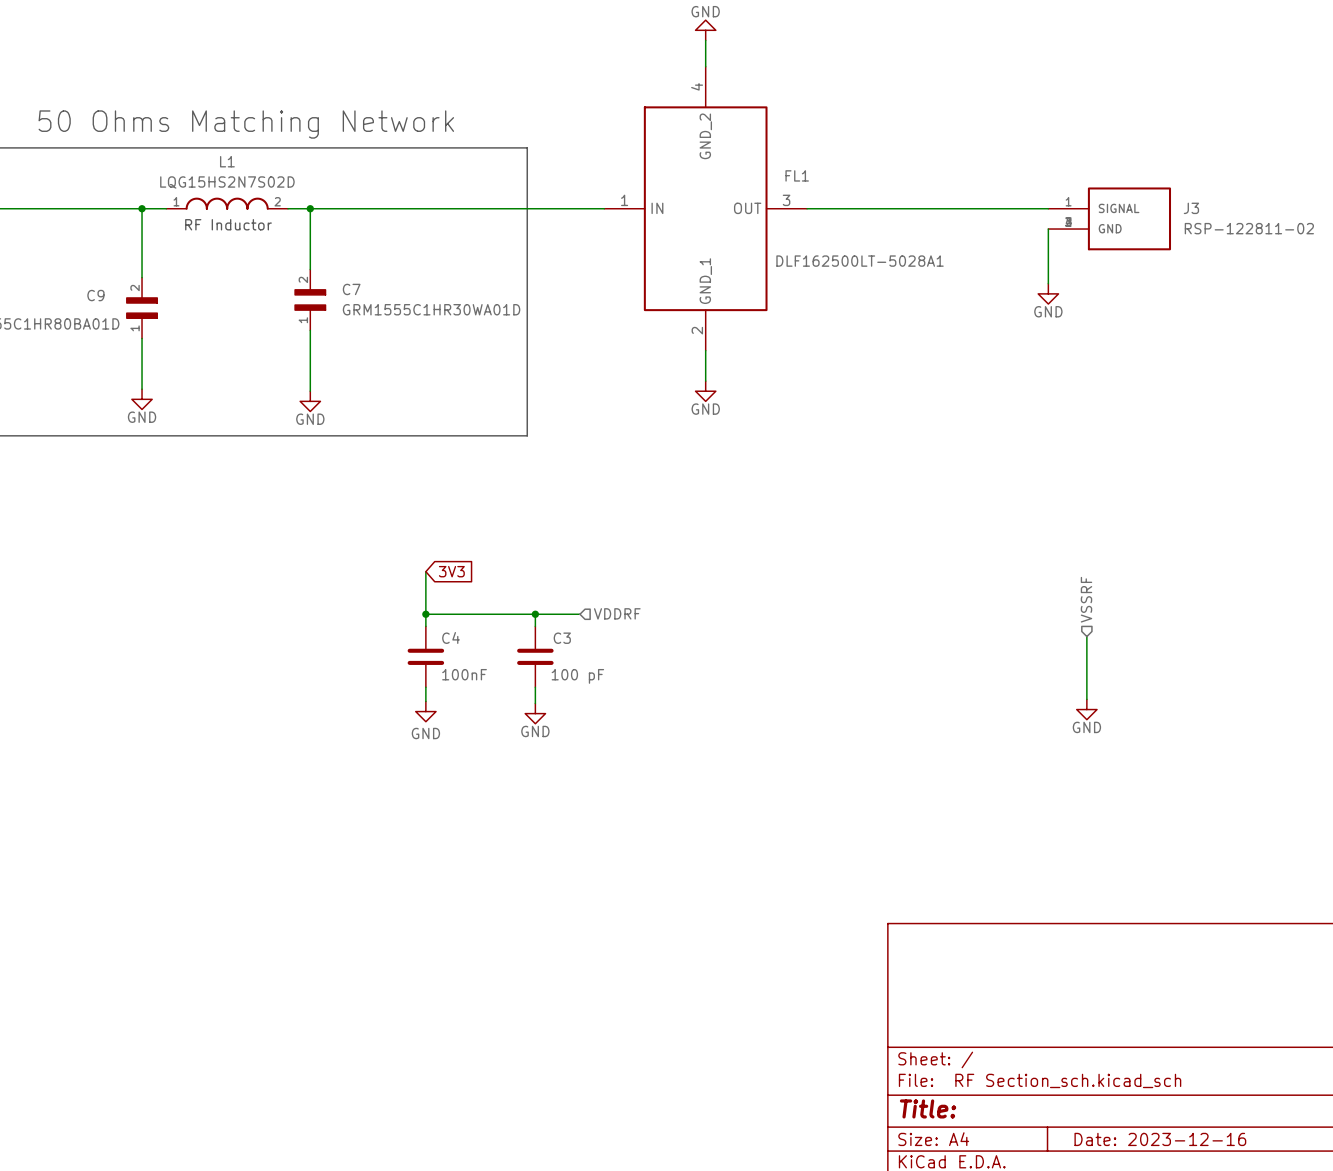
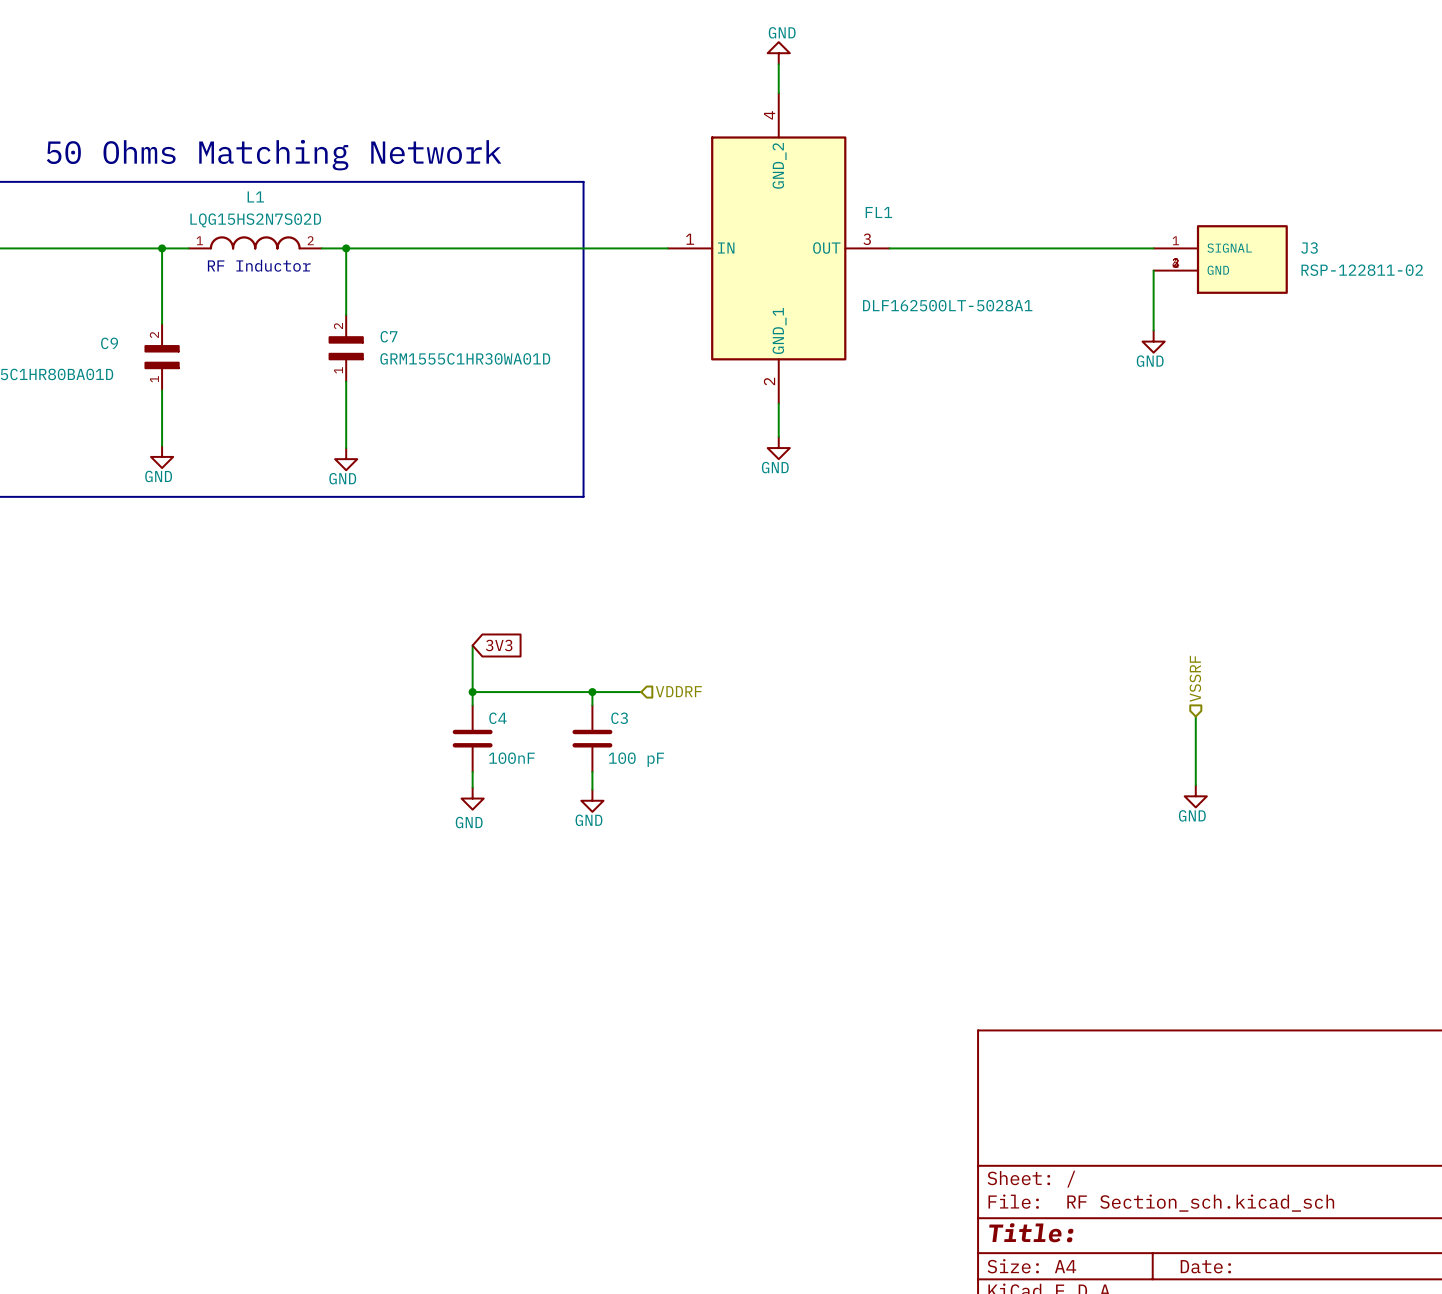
title block: Date: 2023-12-16 (1160, 1139) -> Date: (1205, 1266)

